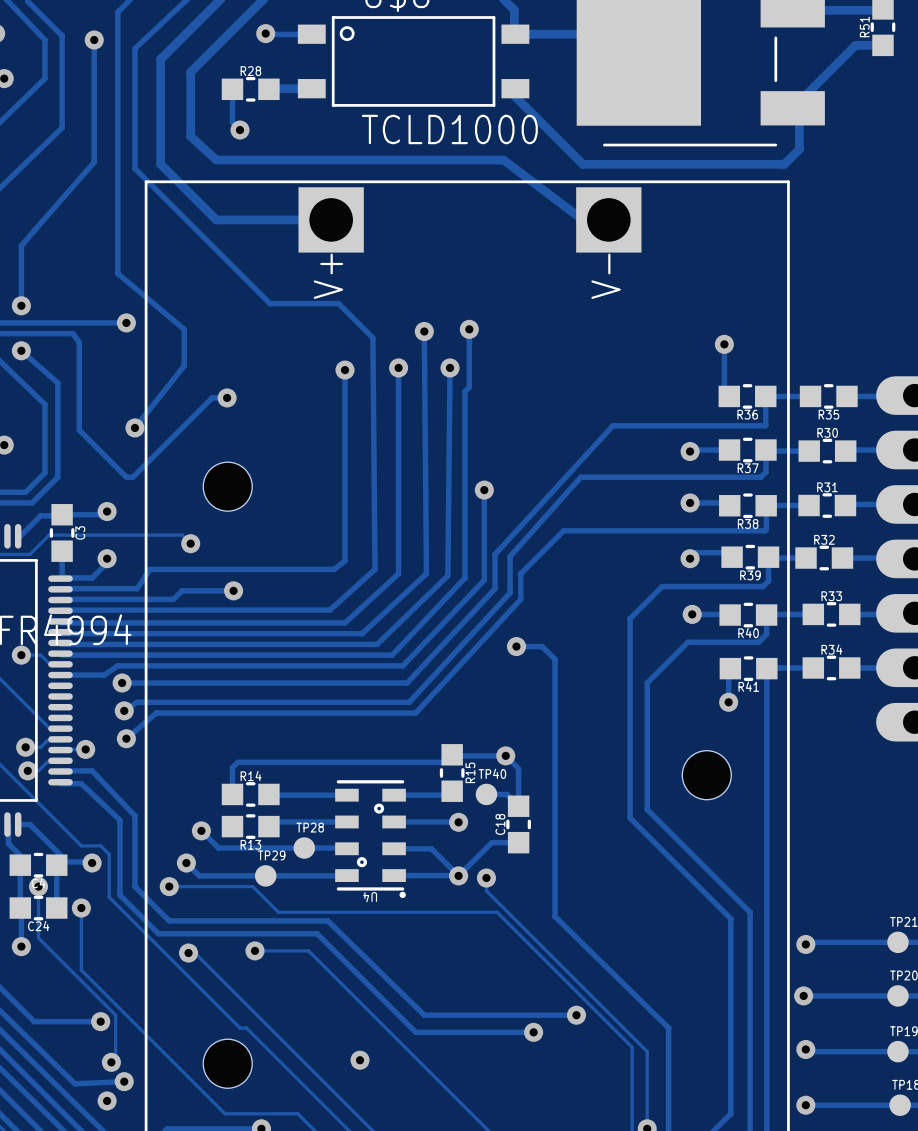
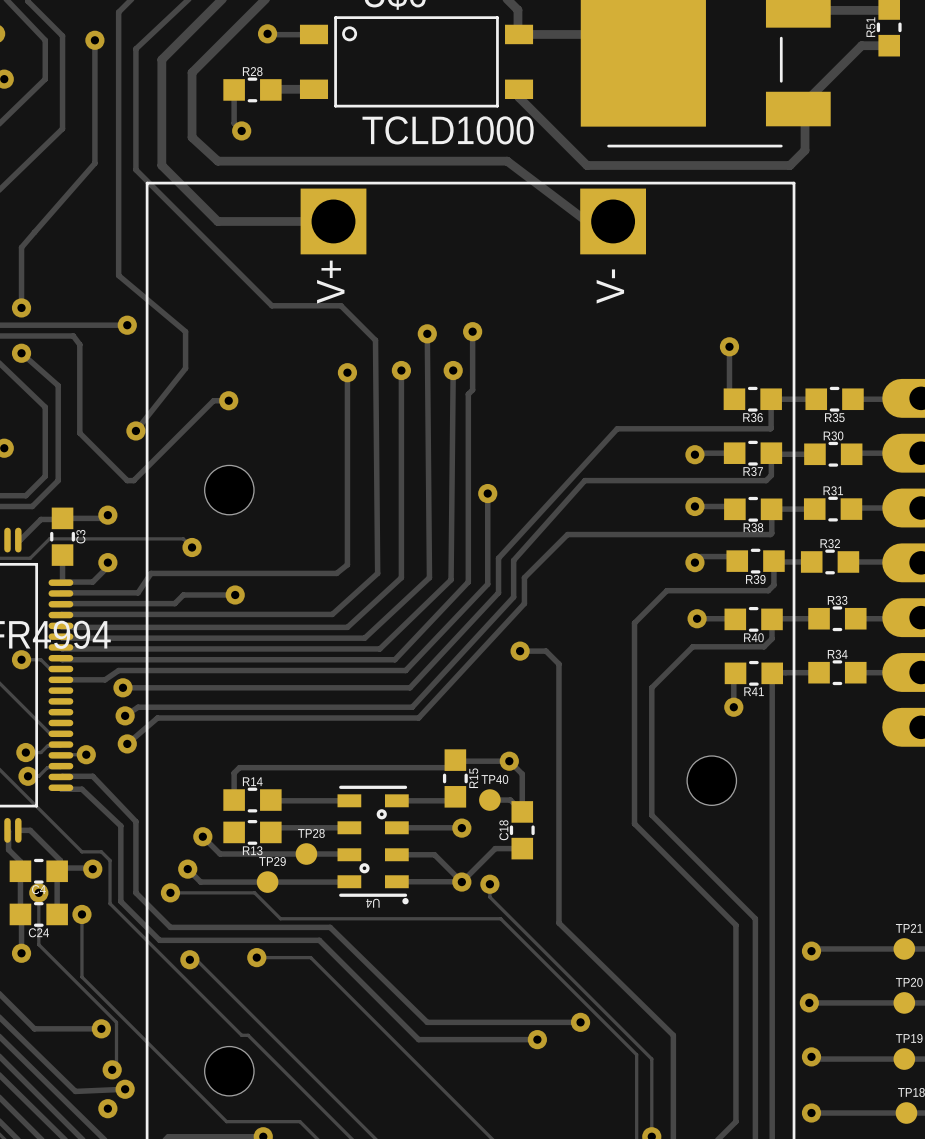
via: (360, 1060) -> none

